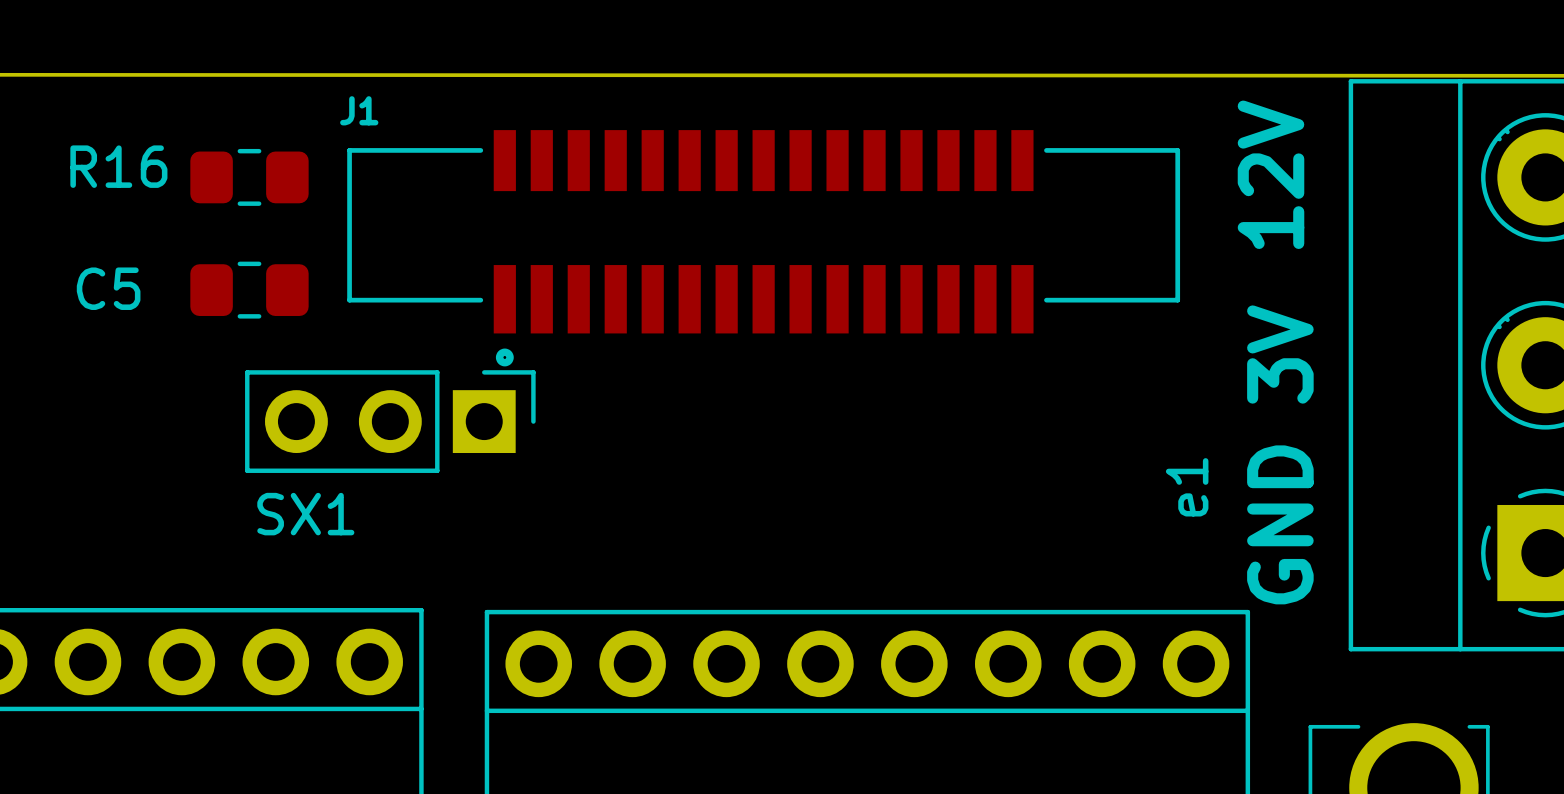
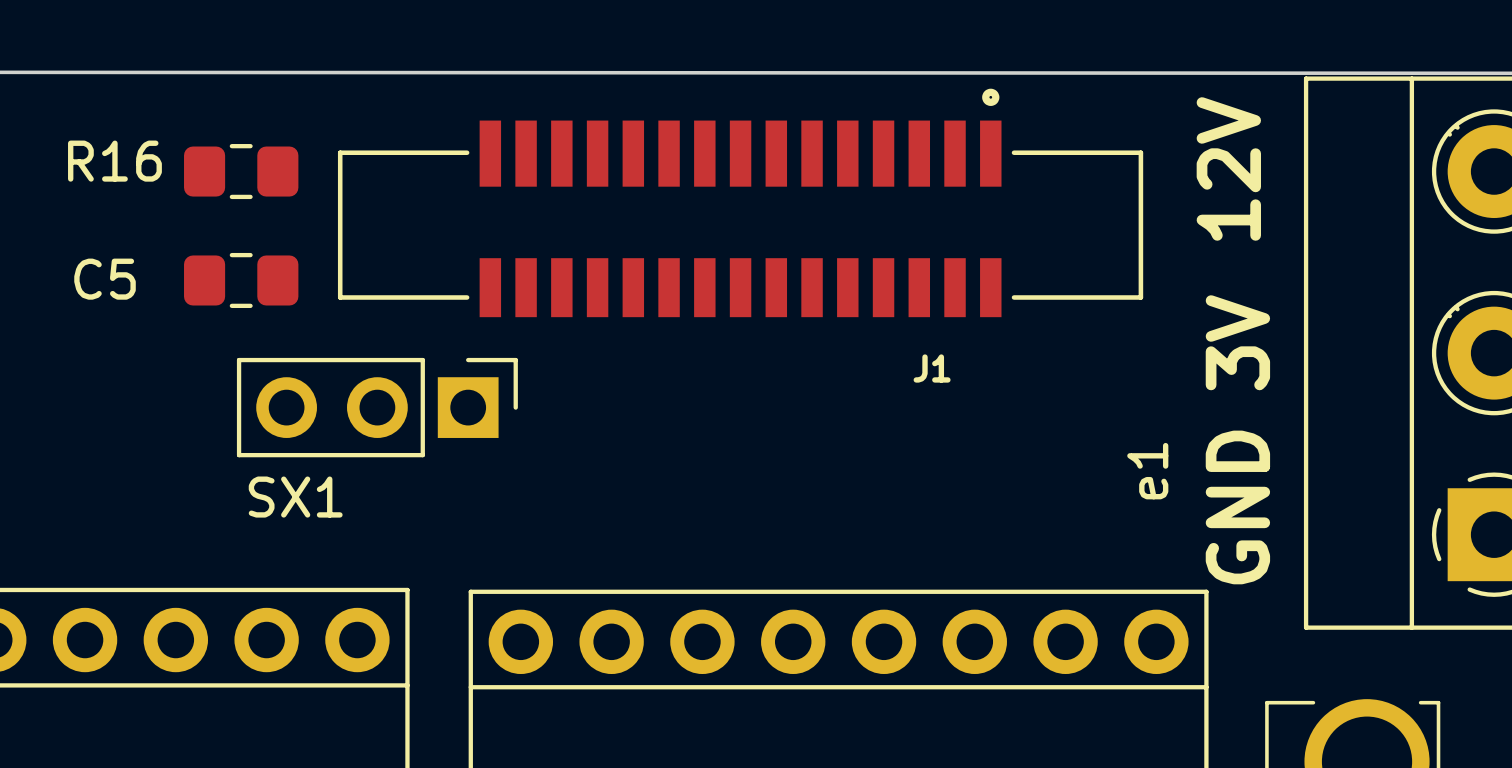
J1 name position: J1 (359, 110) -> J1 (932, 368)
J1 rotation: 0° (763, 248) -> 180° (740, 202)

